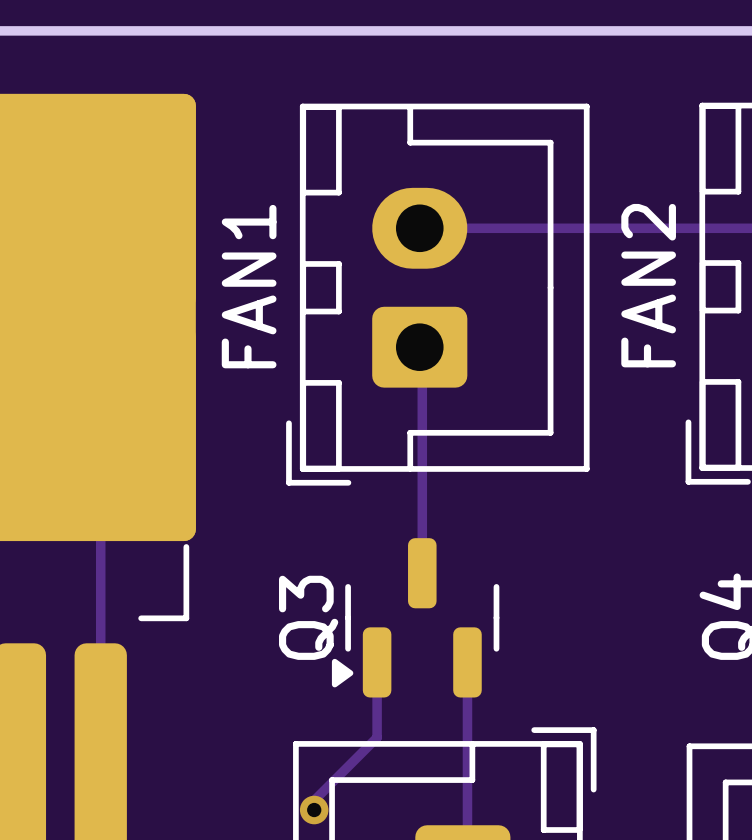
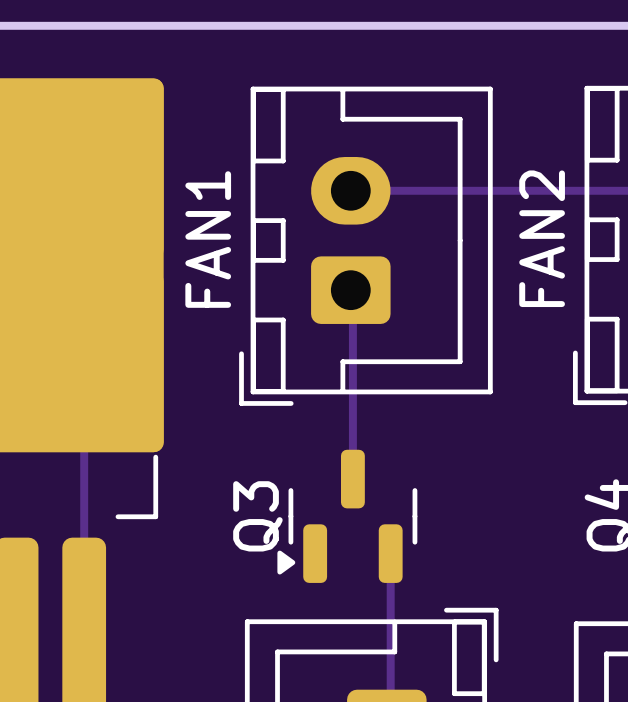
track: (377, 662) (377, 737) (314, 800) (314, 810) -> none
via: (314, 810) -> none

